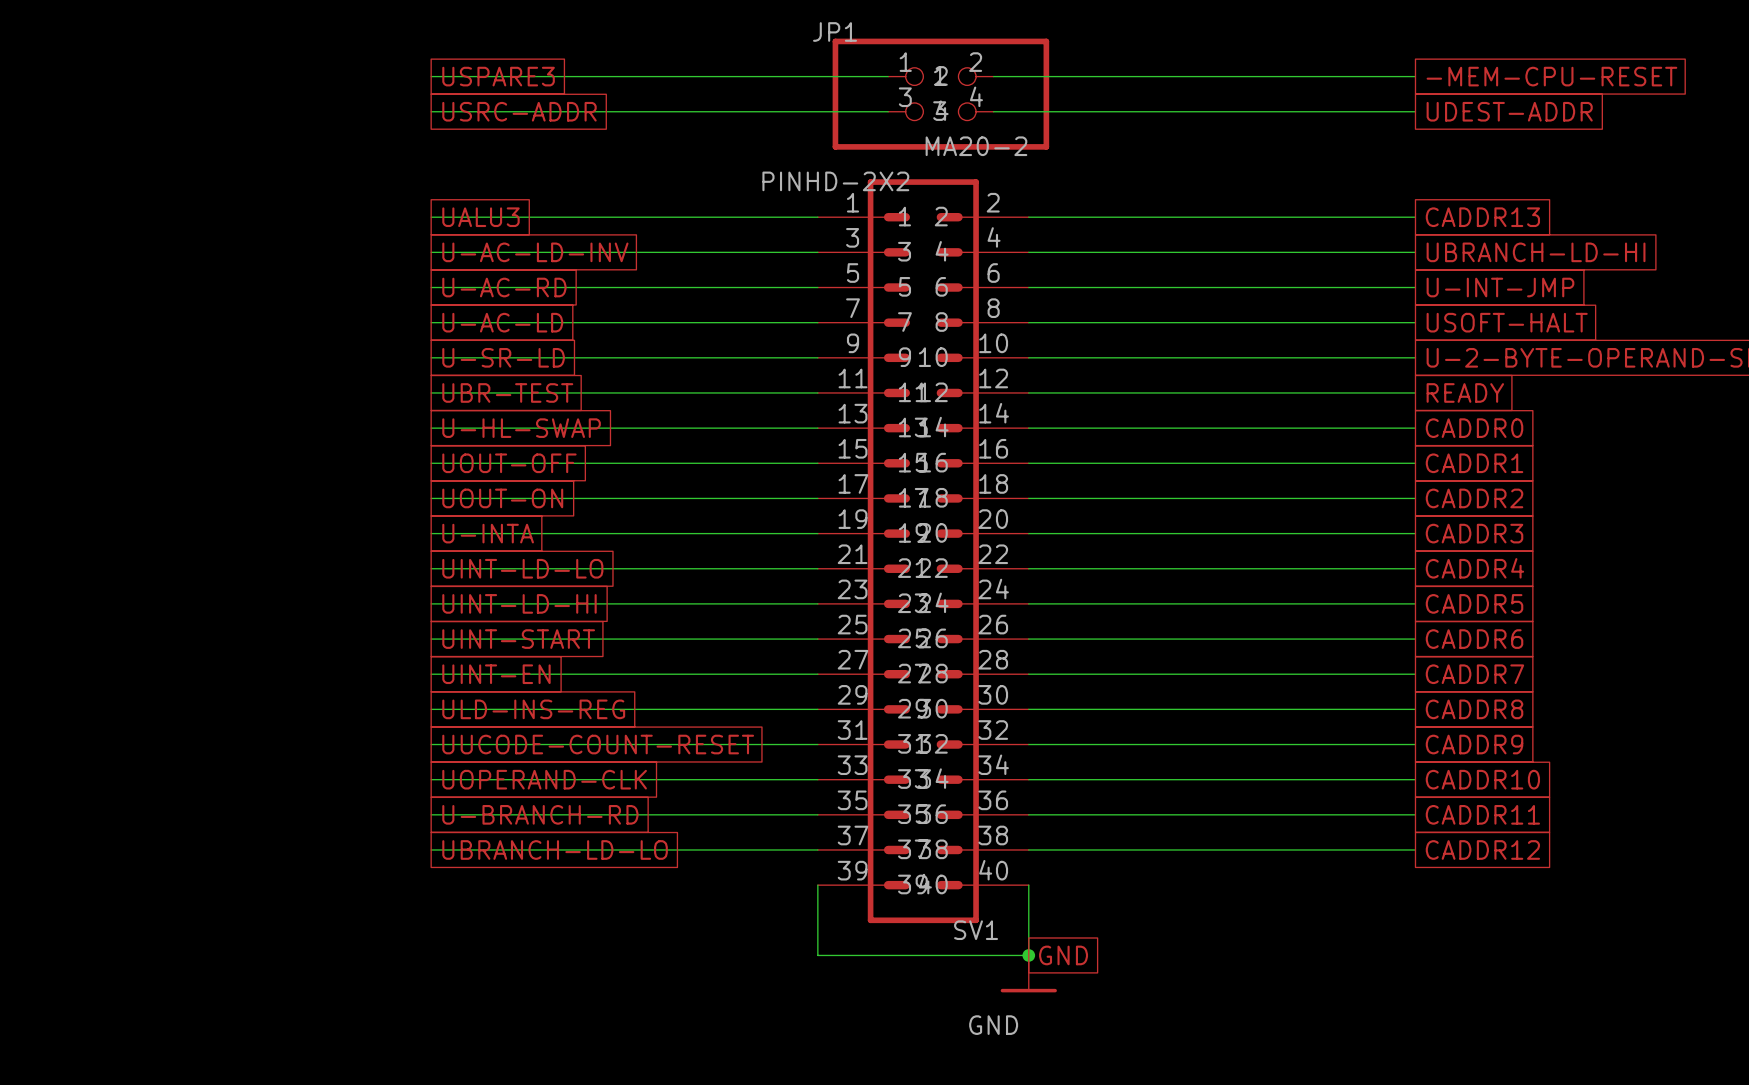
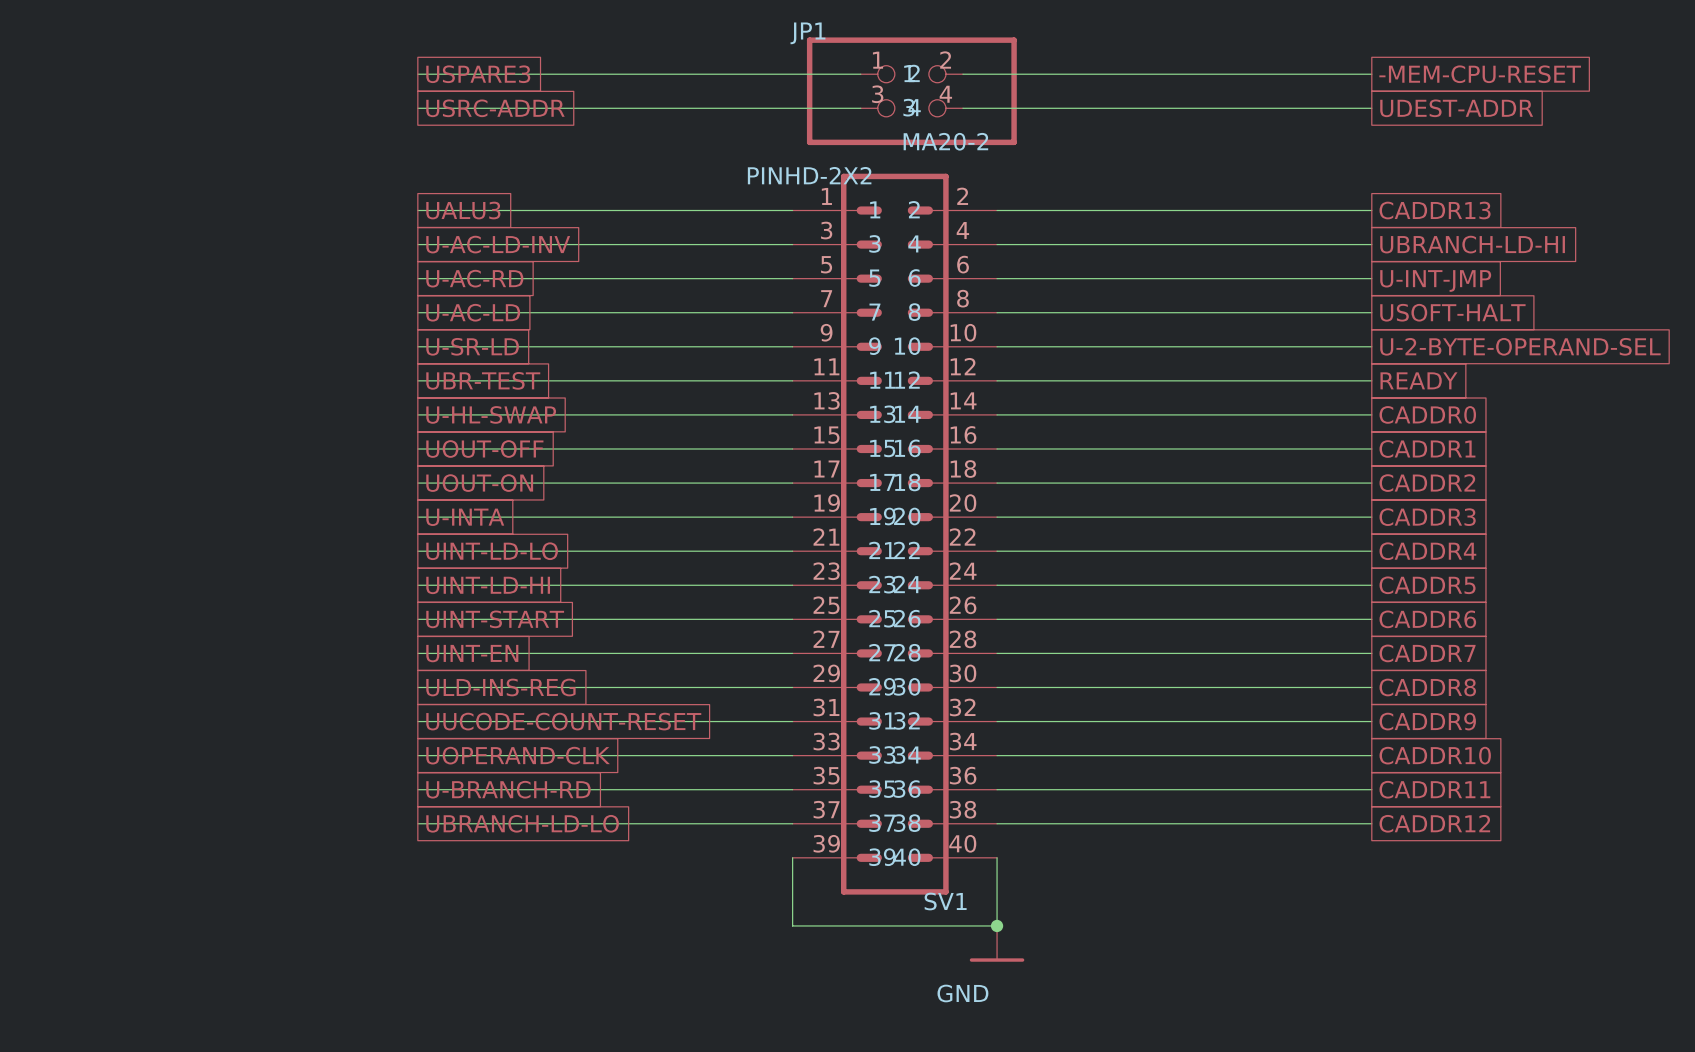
global label: GND (1063, 955) -> none

